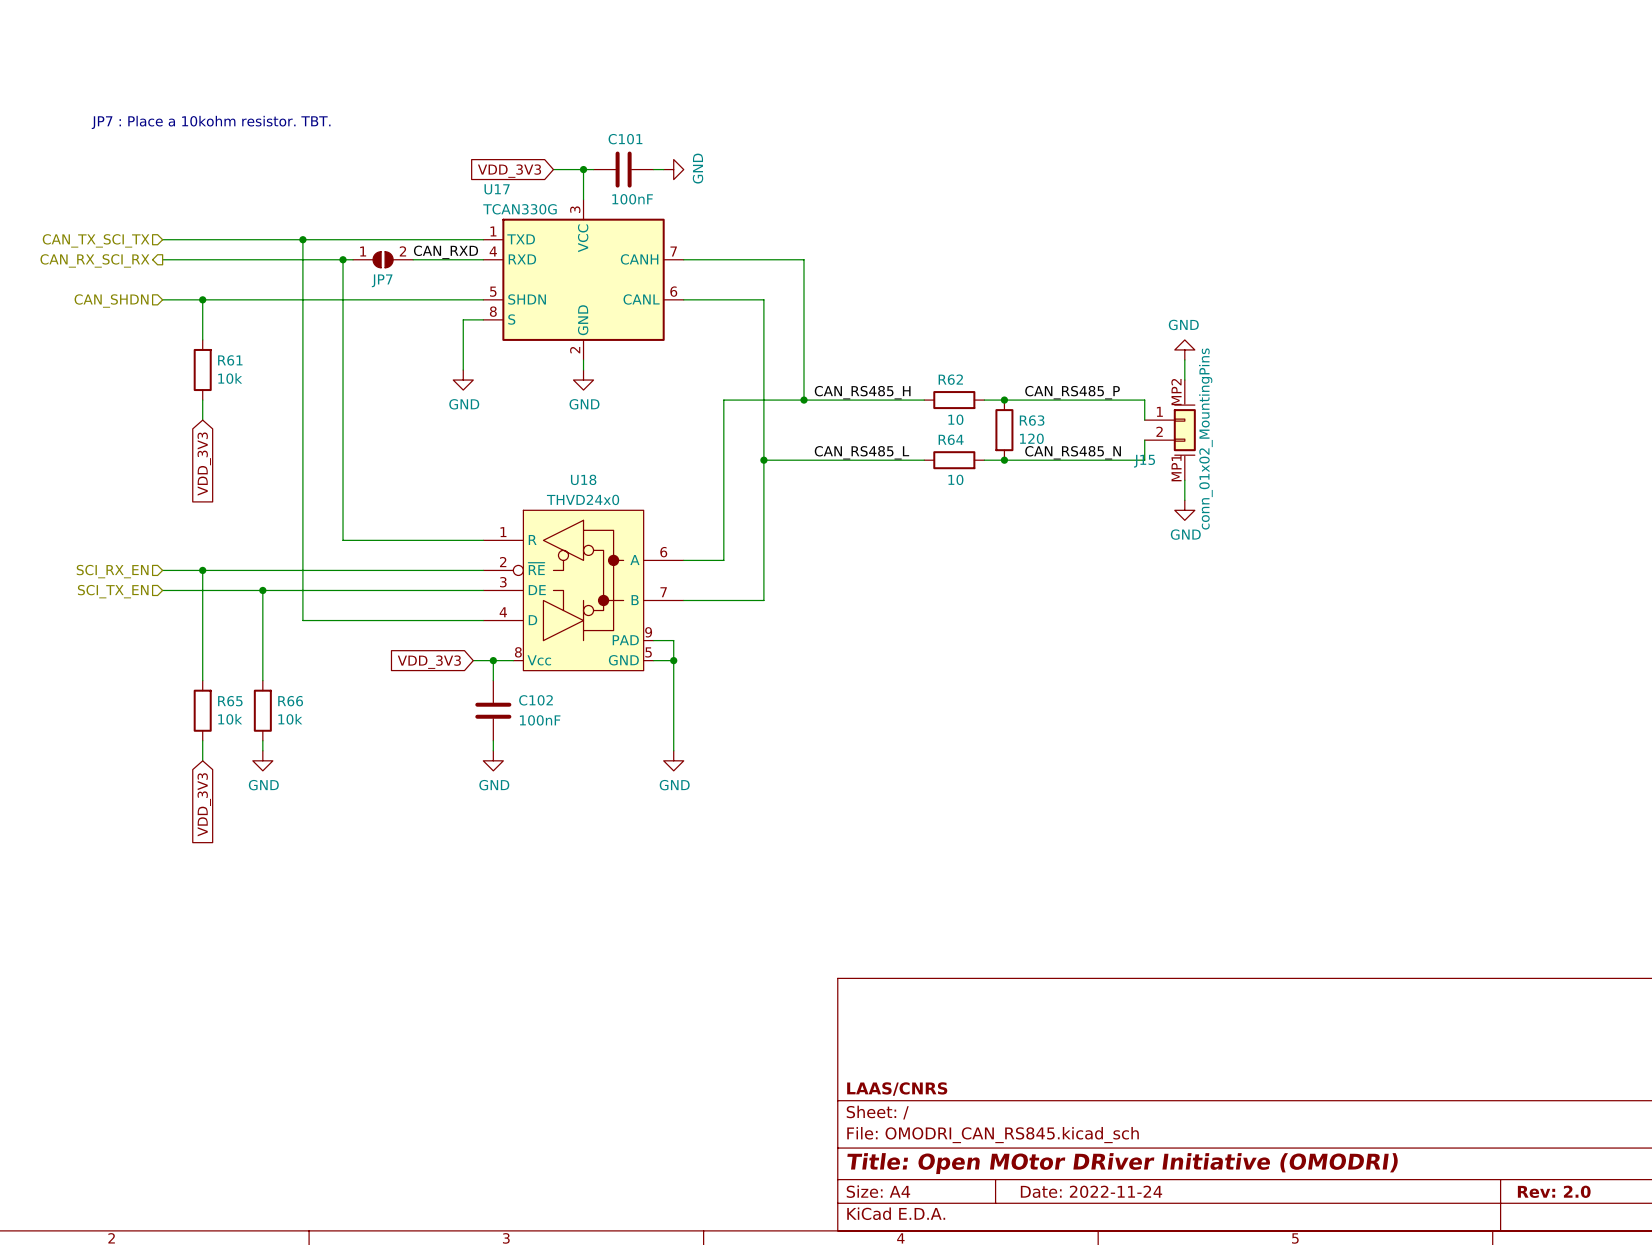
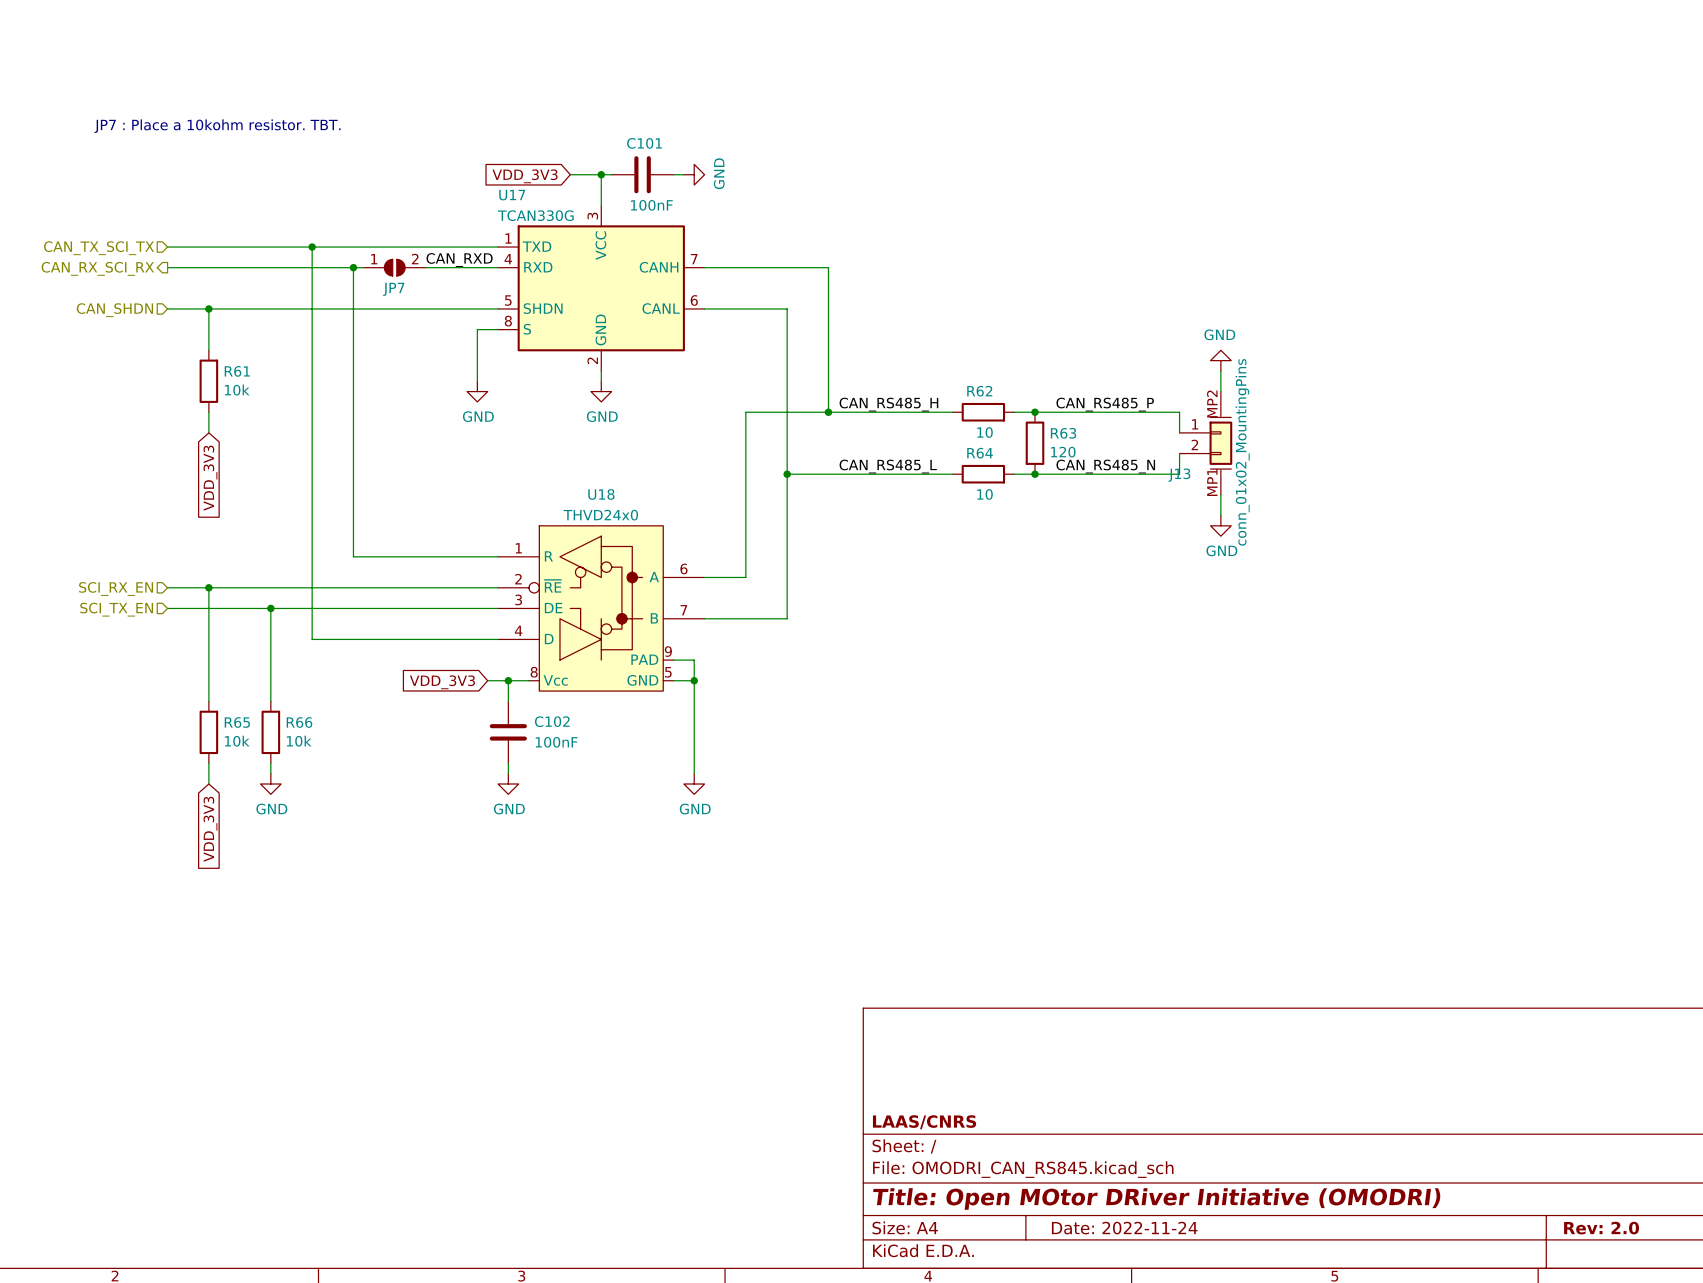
J15 name: J15 (1144, 461) -> J13 (1179, 475)

